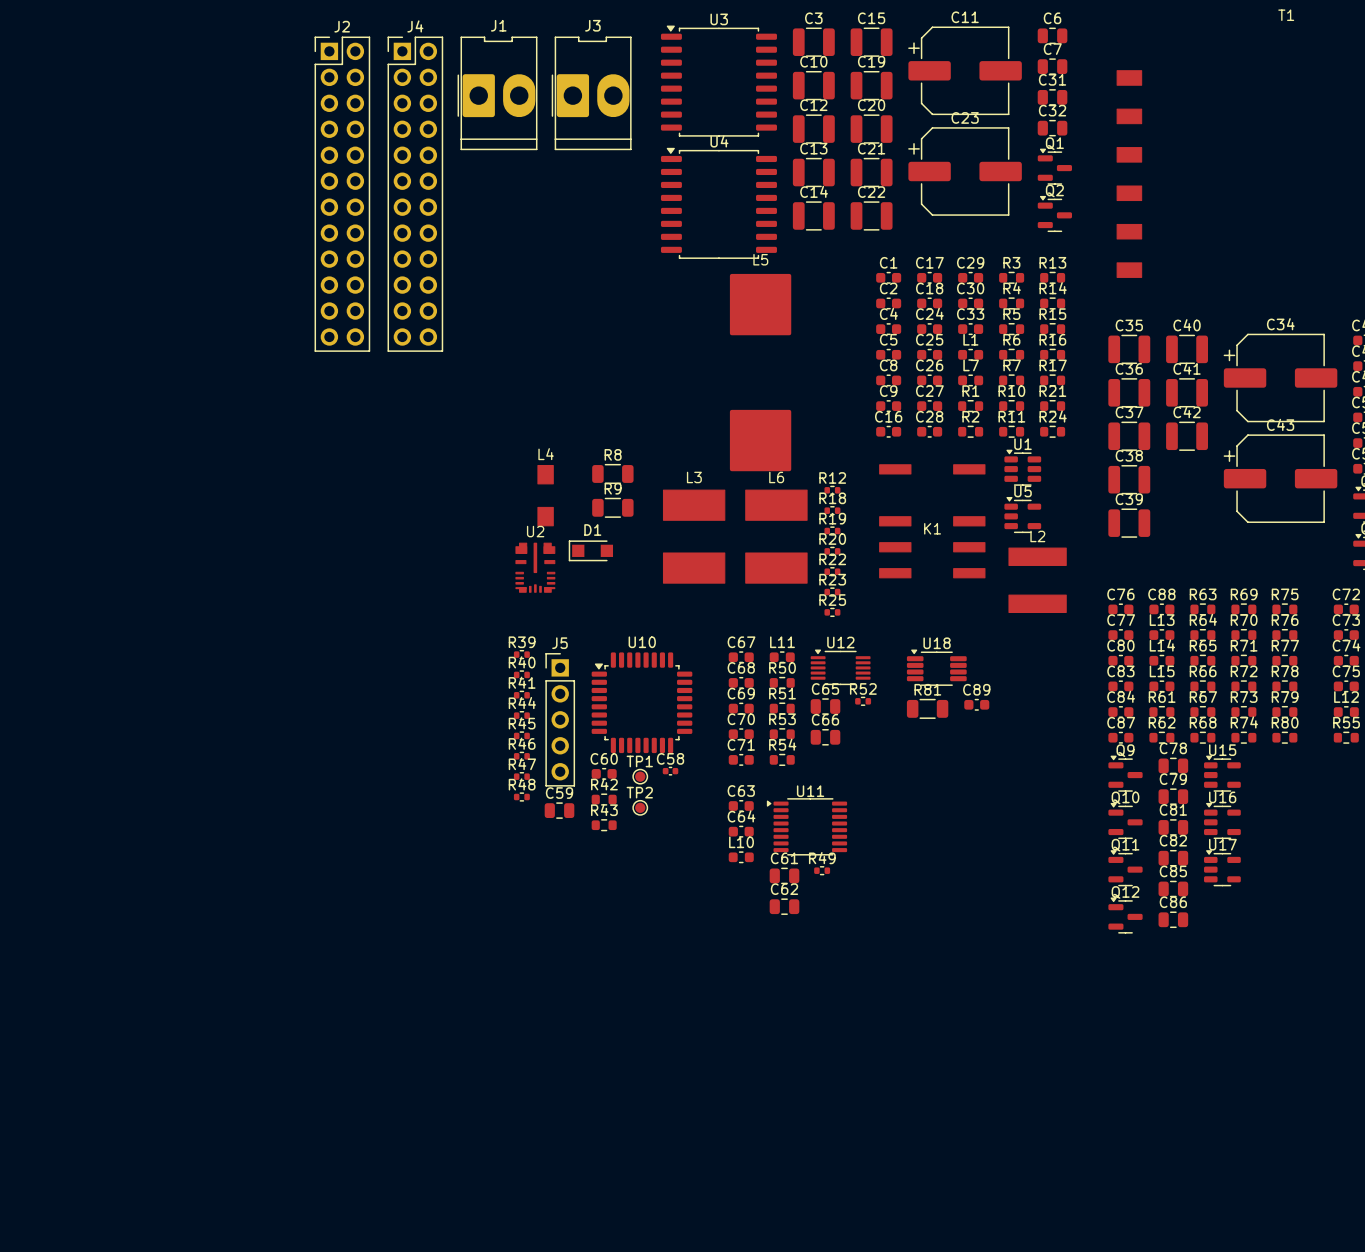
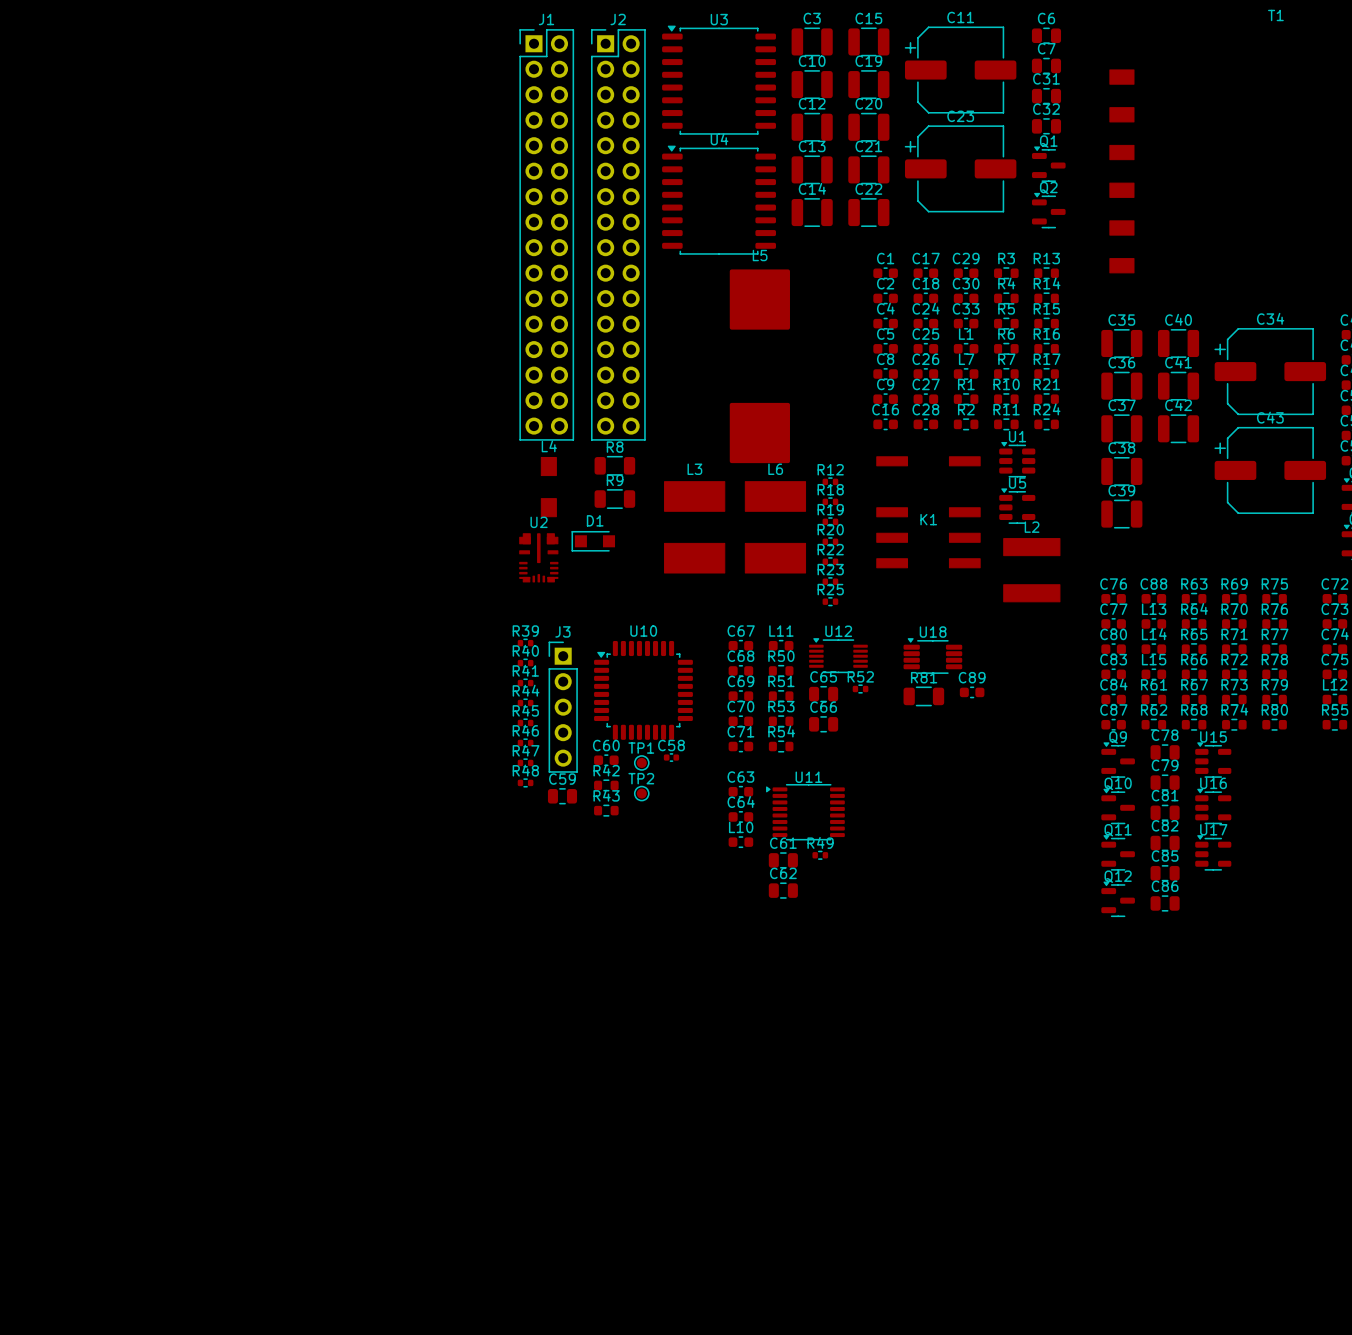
J1 name position: J1 (498, 25) -> J1 (546, 19)
J2 name position: J2 (342, 26) -> J2 (618, 19)
J2 footprint: [314, 36, 371, 352] -> [591, 29, 646, 441]
J1 footprint: [457, 36, 538, 151] -> [519, 29, 574, 441]
J3: (591, 93) -> none
J4: (415, 194) -> none
J5 name: J5 (559, 643) -> J3 (562, 631)

